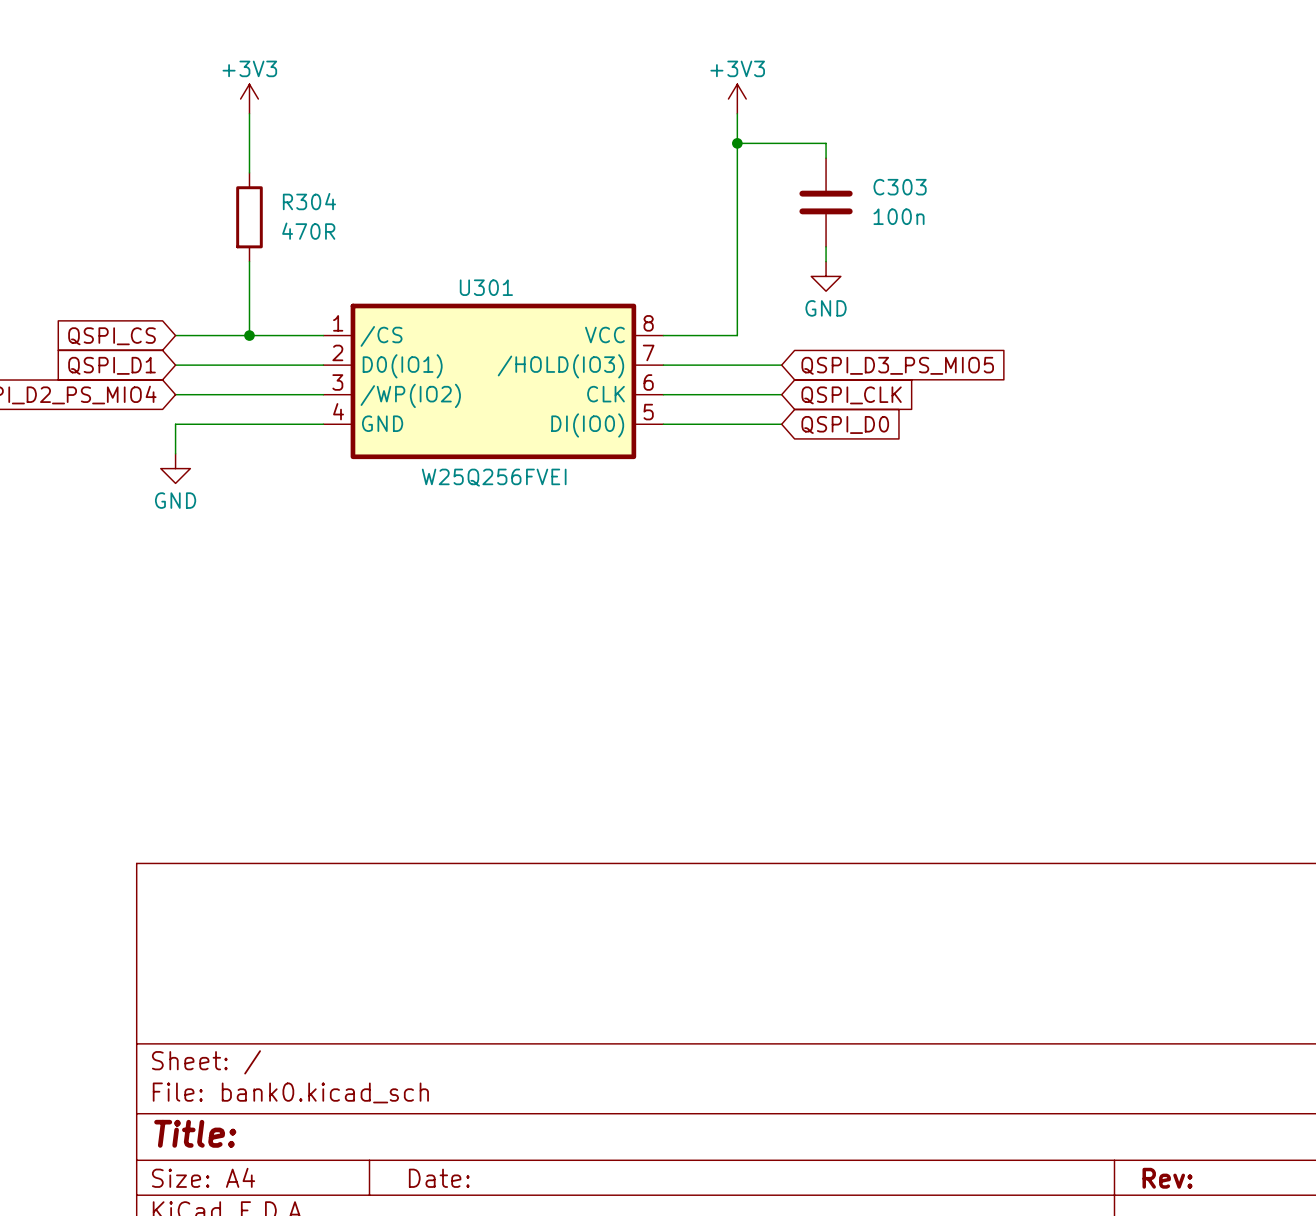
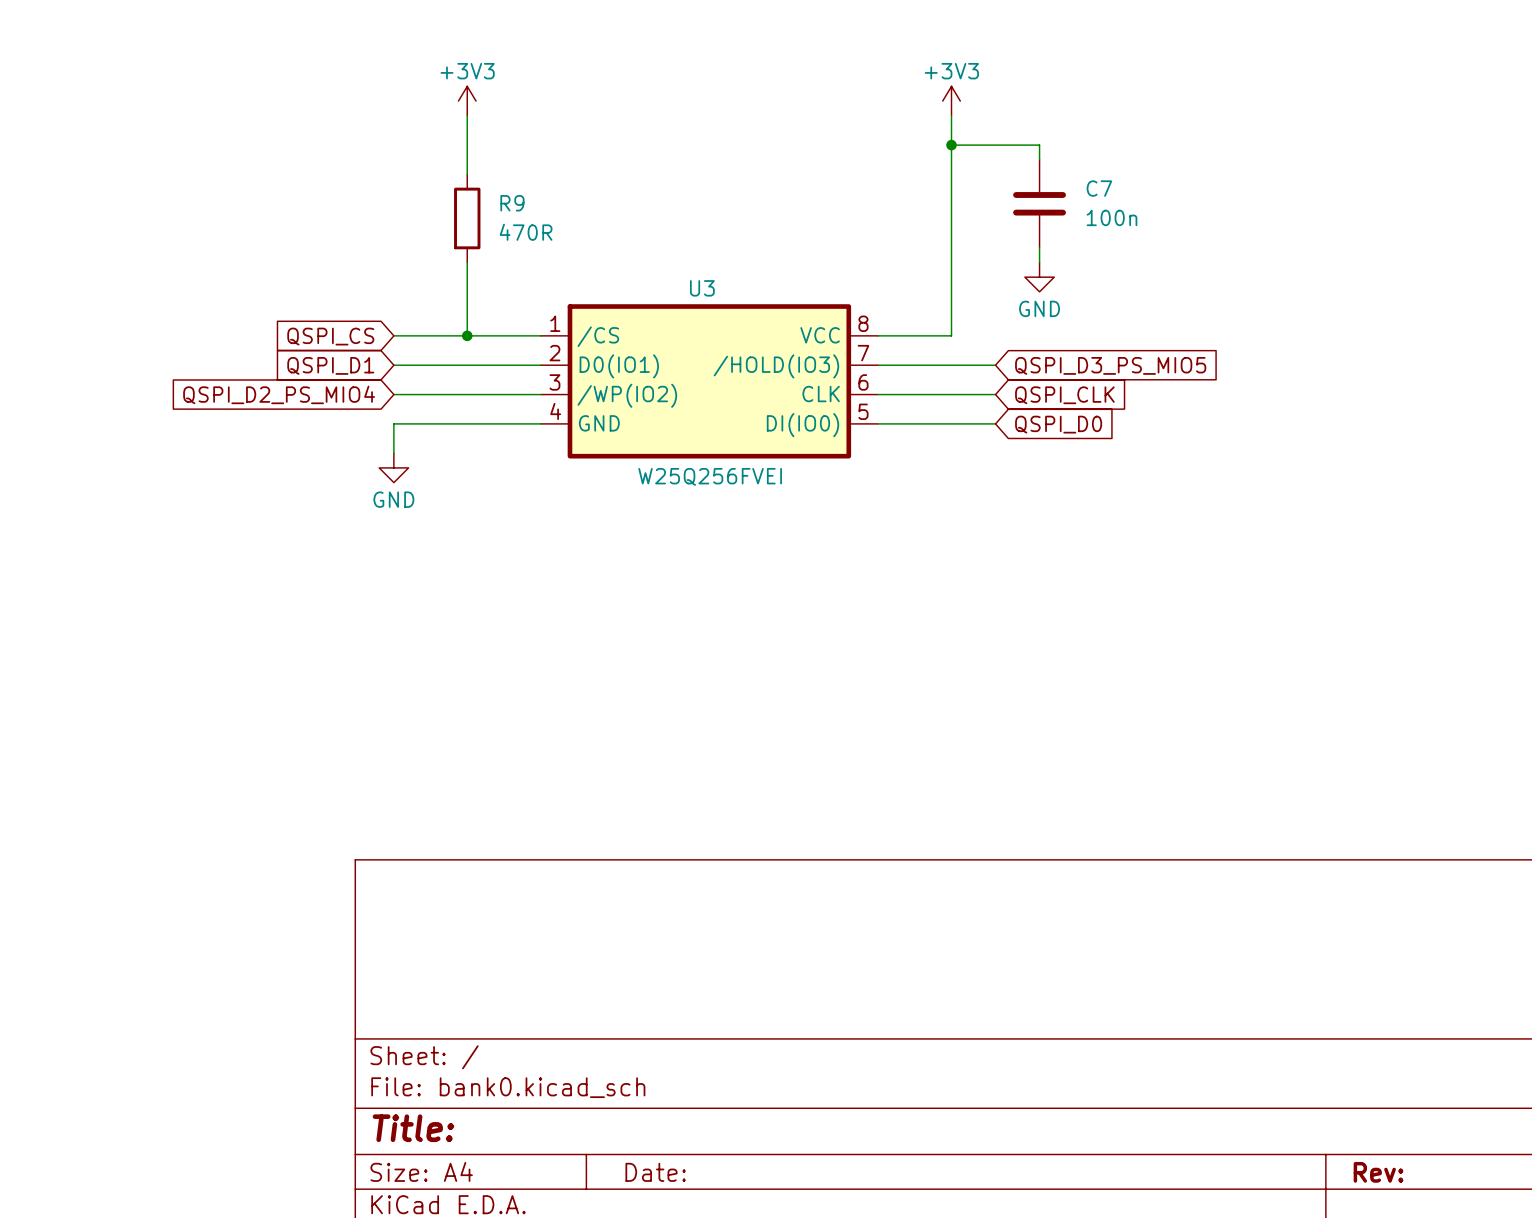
C303 name: C303 (900, 187) -> C7 (1099, 188)
R304 name: R304 (309, 201) -> R9 (512, 203)
U301 name: U301 (486, 287) -> U3 (702, 288)

